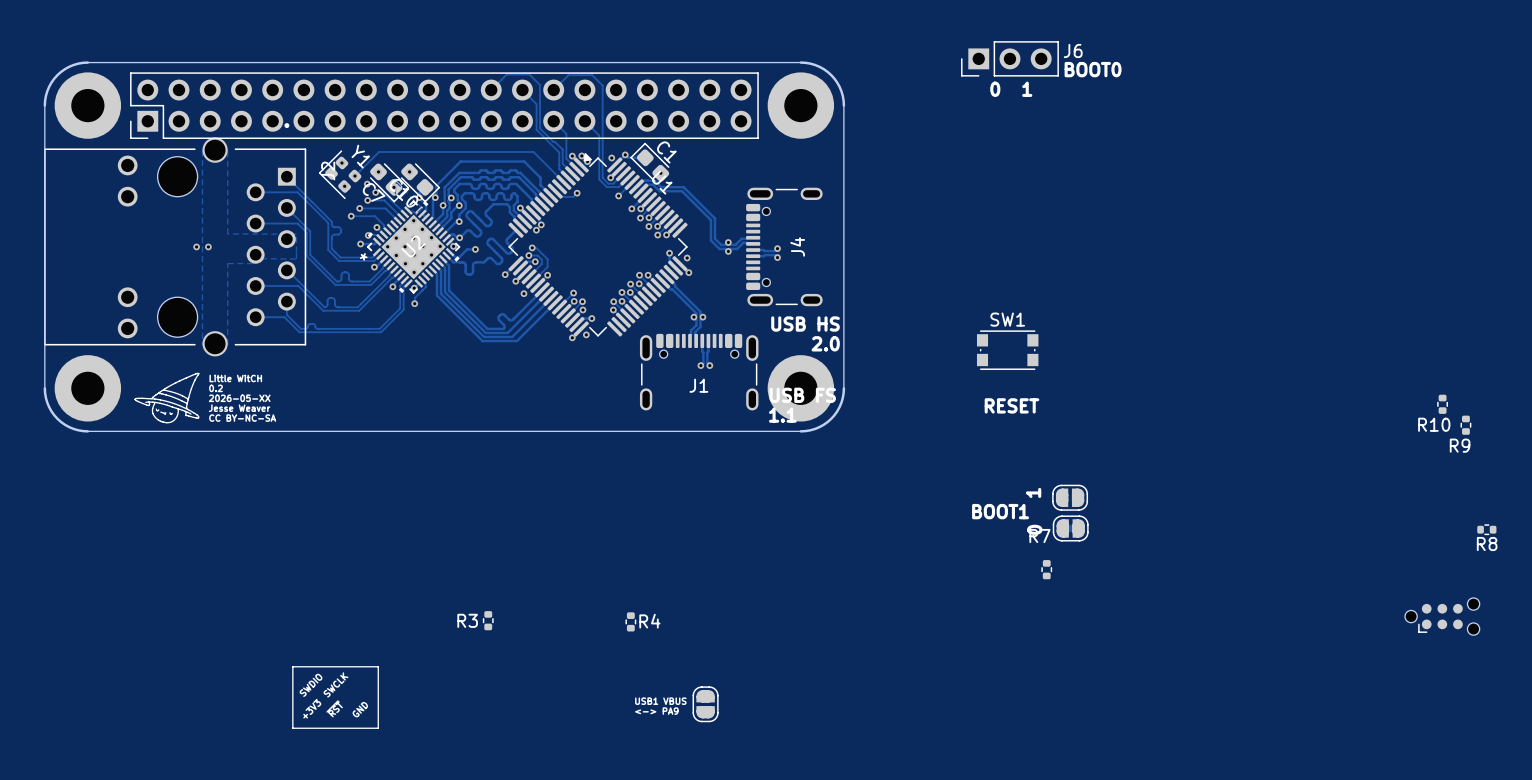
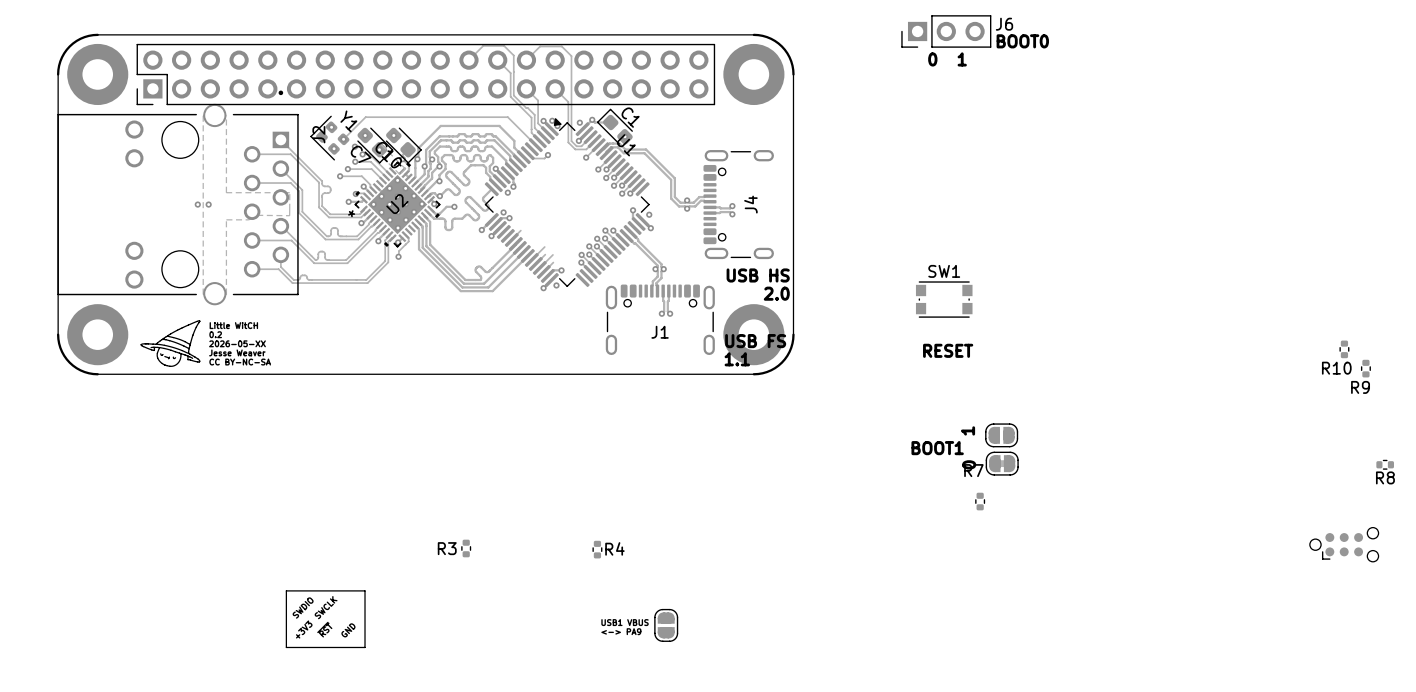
via: (541, 224) -> none
via: none -> (513, 186)
via: (536, 230) -> none
via: none -> (507, 192)
track: (532, 247) (536, 247) (547, 259) (547, 266) (533, 281) -> none
via: (532, 247) -> none
track: (528, 255) (537, 255) (541, 259) (541, 264) (529, 276) -> none
via: (547, 275) -> none
via: (523, 293) -> none
via: (573, 293) -> none
via: (574, 301) -> none
via: (582, 301) -> none
via: (582, 309) -> none

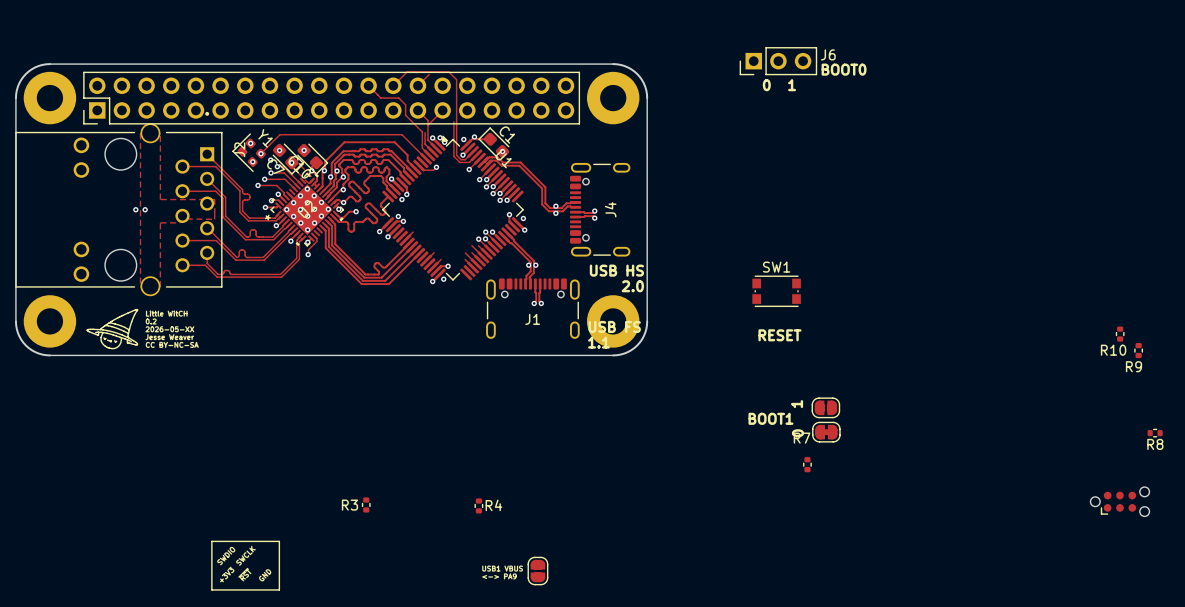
track: (539, 47) (561, 46) (571, 56) -> (393, 85) (407, 71) (448, 71) (456, 79) (456, 82)
track: (468, 60) (483, 45) (504, 45) (513, 55) (513, 95) (534, 114) -> (368, 85) (380, 98) (398, 98) (405, 104) (405, 115) (422, 132) (422, 135)
track: (497, 60) (510, 73) (510, 96) (531, 117) -> none
track: (555, 89) (568, 102) -> (442, 110) (427, 125)
track: (544, 246) (531, 259) -> none
via: (589, 246) -> none
via: (596, 246) -> none
track: (552, 254) (539, 267) -> none
via: (581, 254) -> none
via: (589, 254) -> none
via: (581, 262) -> none

